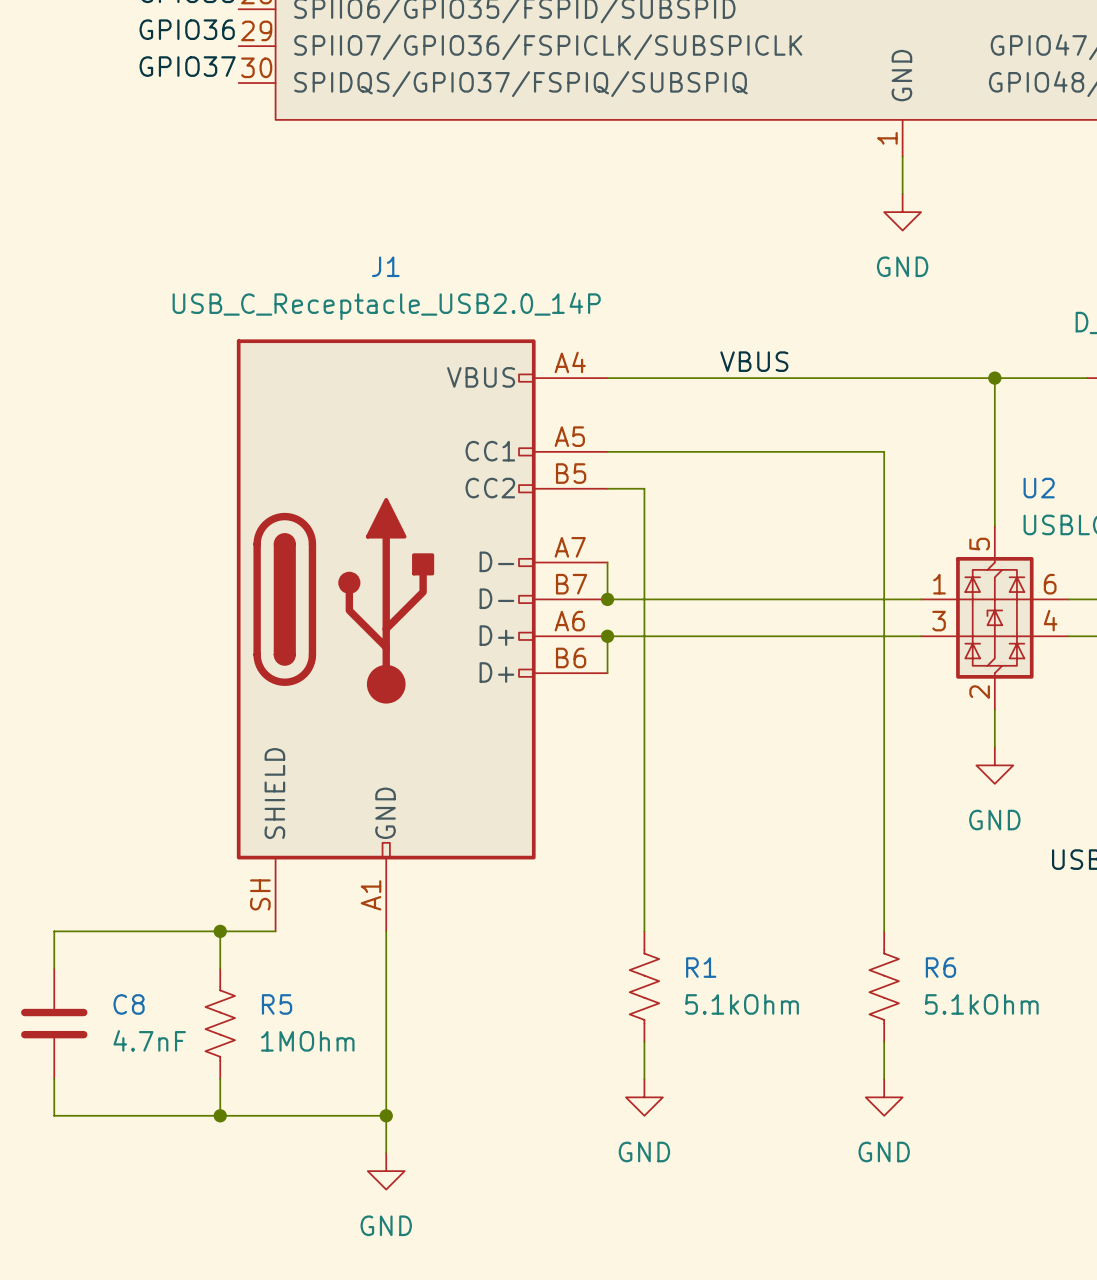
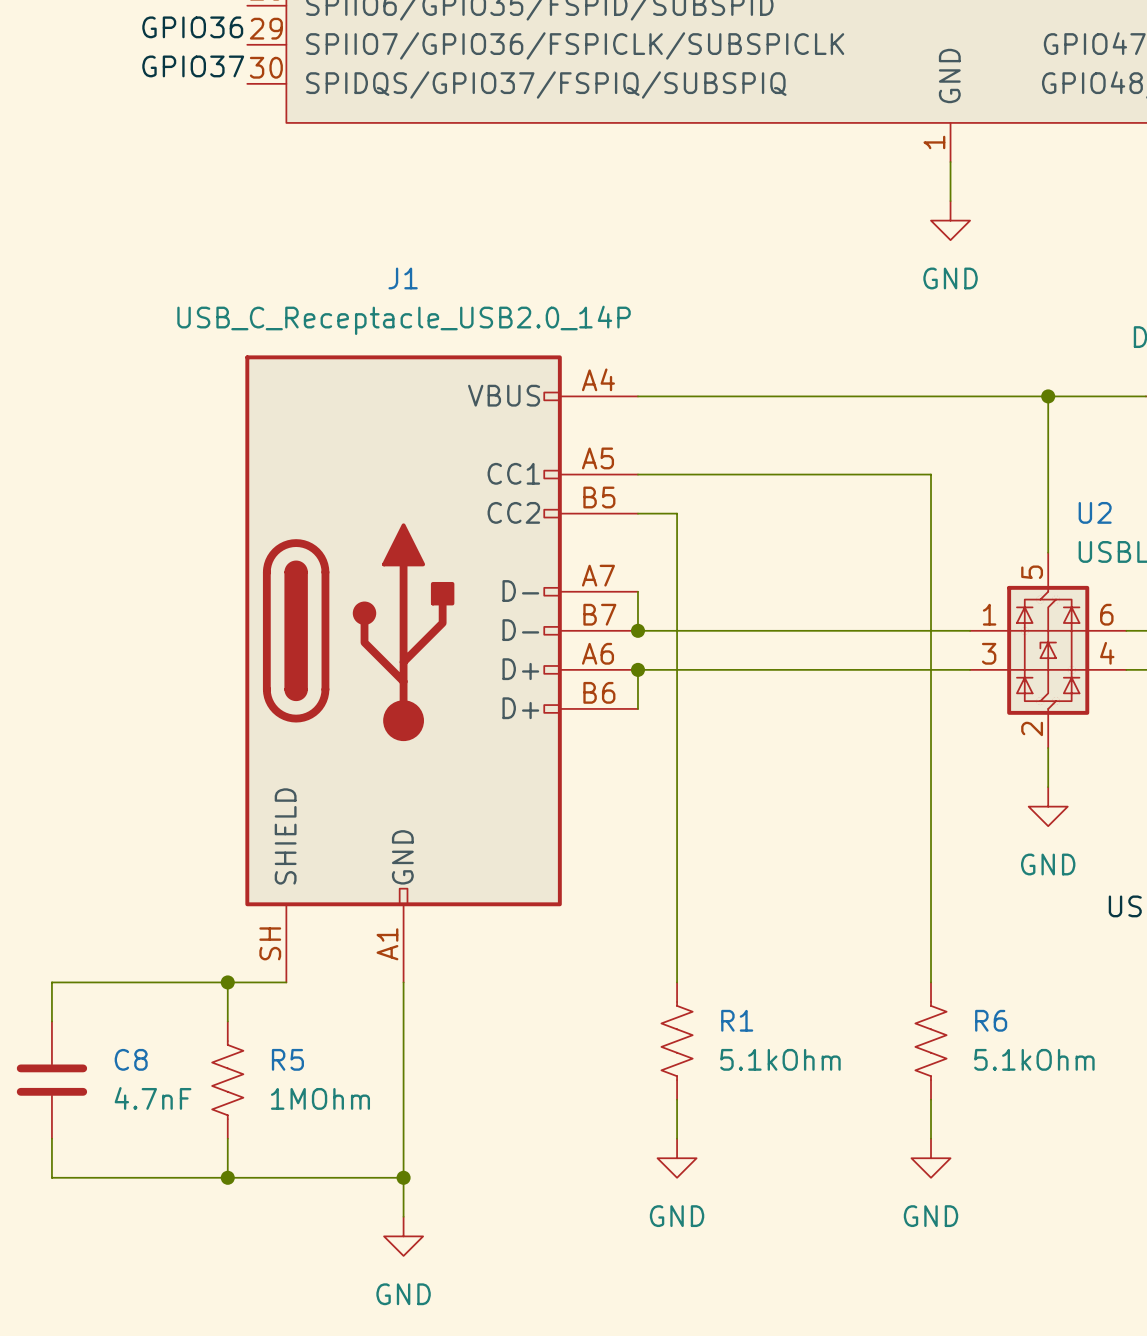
label: VBUS (754, 361) -> none

